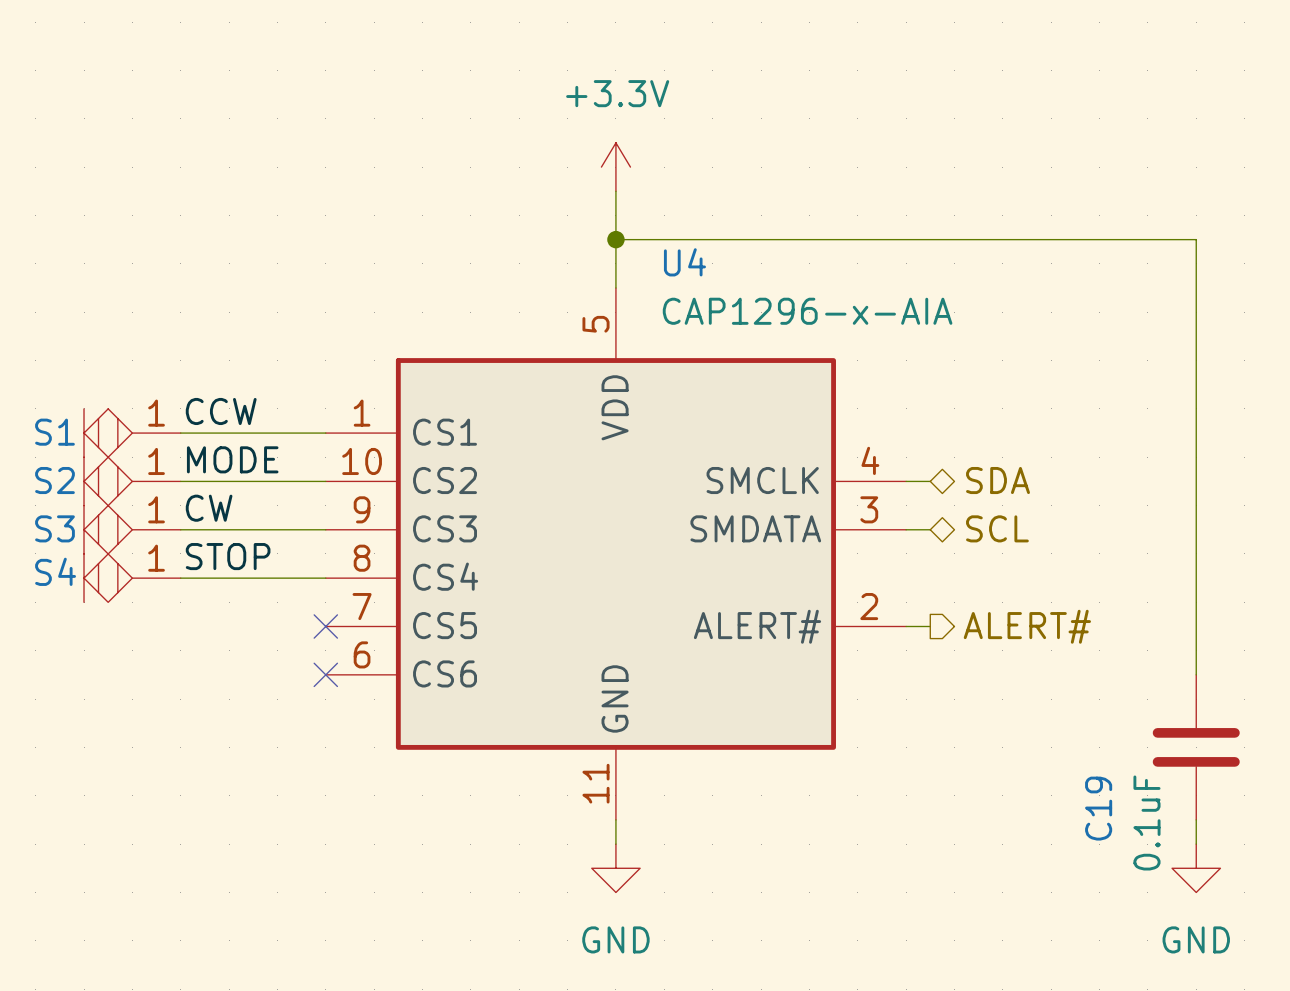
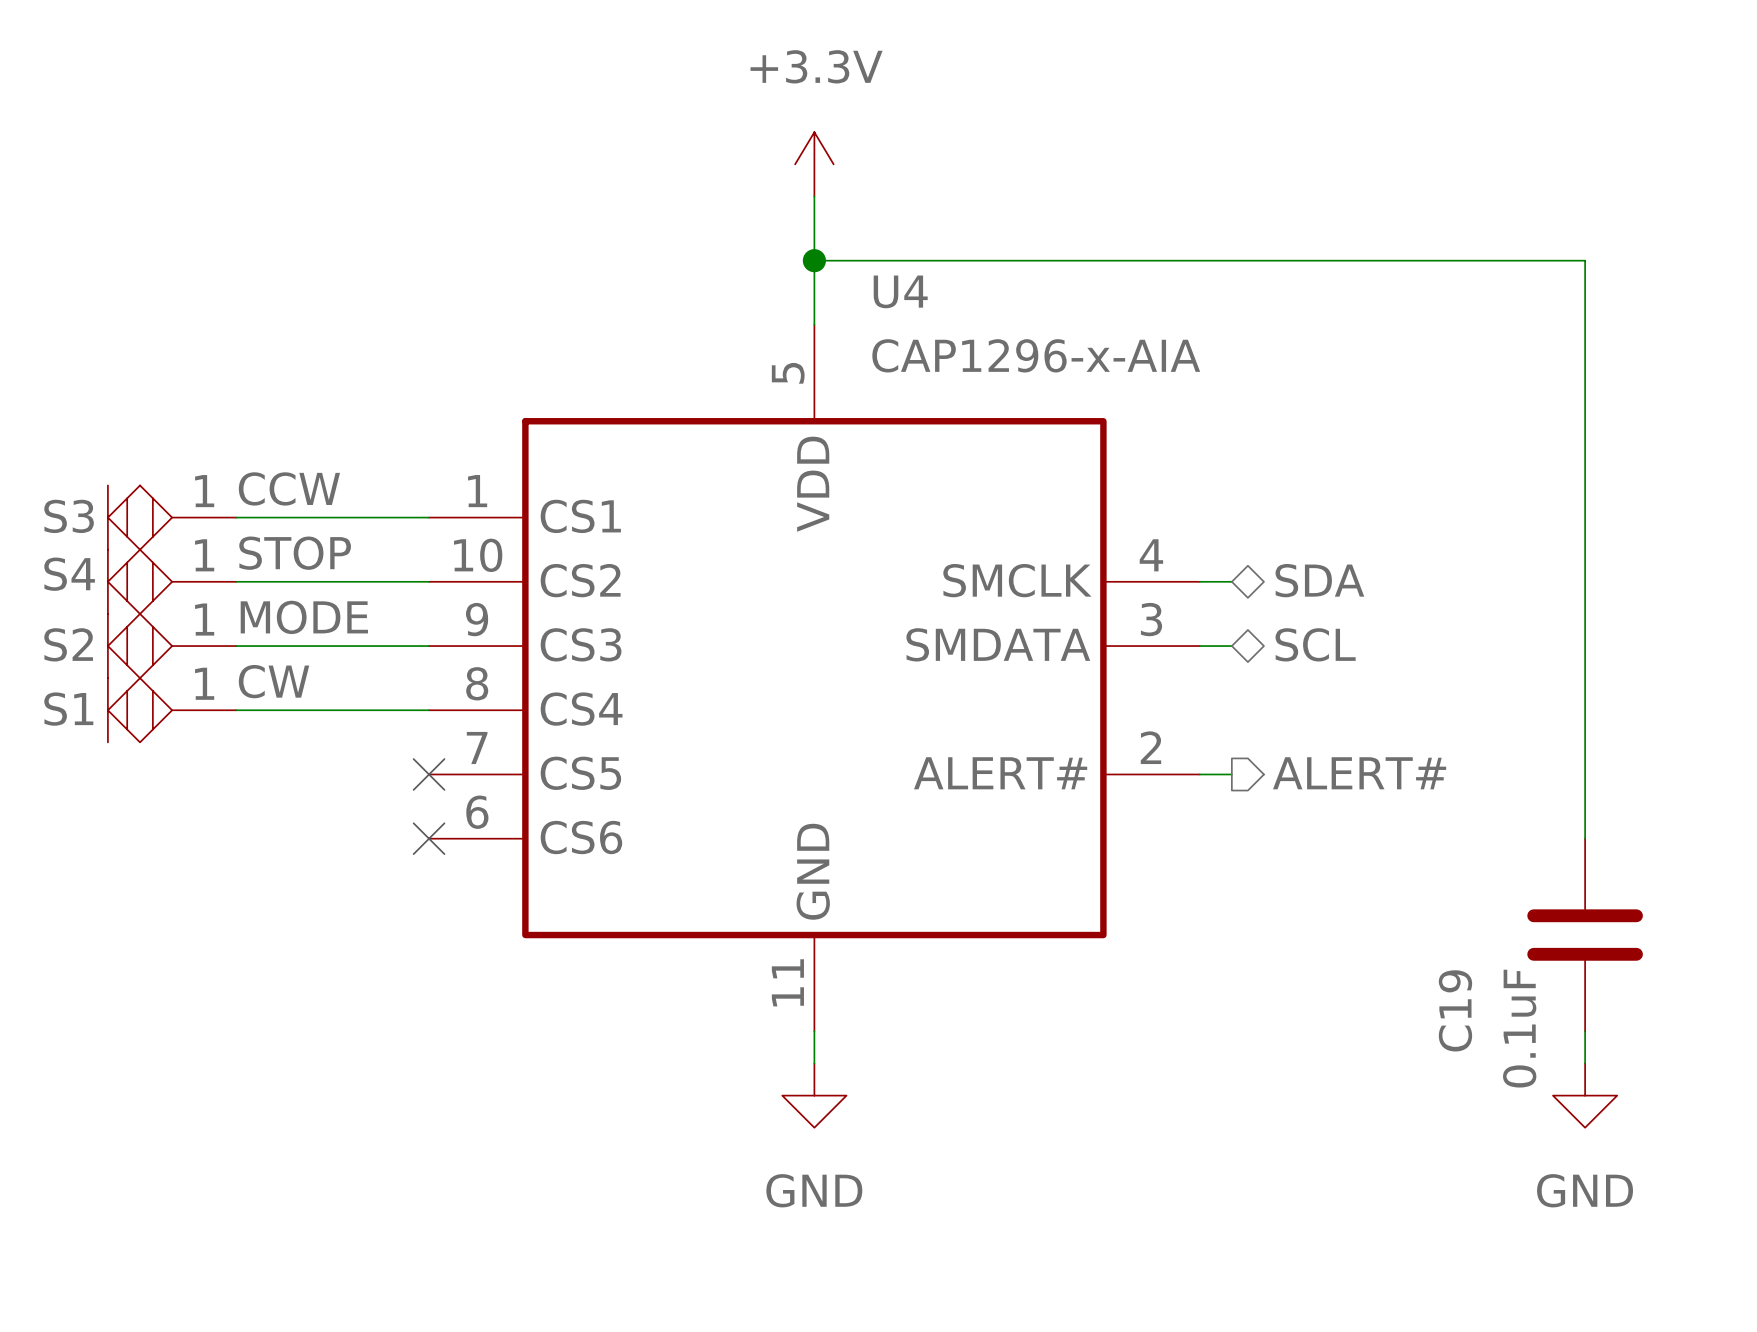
S1 name: S1 (54, 432) -> S3 (69, 516)
label: MODE (232, 459) -> STOP (295, 553)
S2 name: S2 (54, 480) -> S4 (69, 574)
label: CW (209, 508) -> MODE (304, 617)
S3 name: S3 (54, 528) -> S2 (68, 644)
label: STOP (228, 556) -> CW (274, 681)
S4 name: S4 (55, 571) -> S1 (68, 709)

